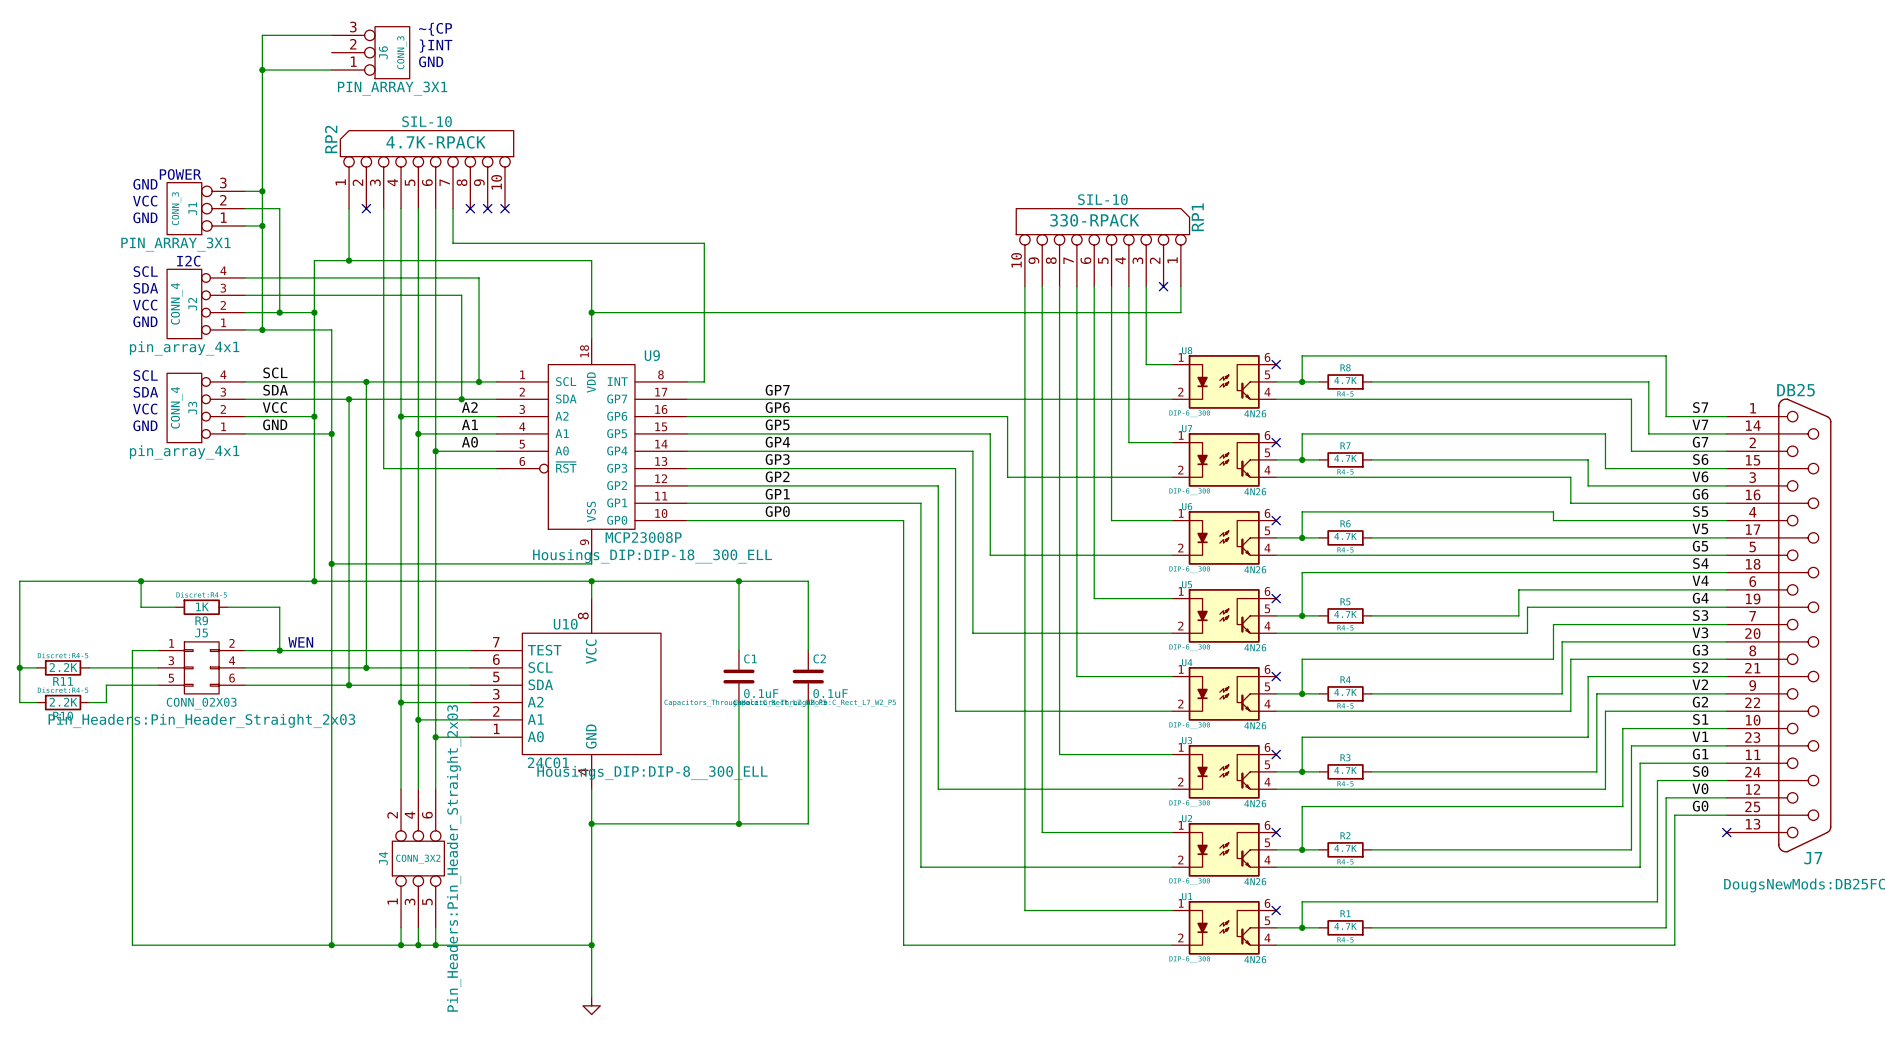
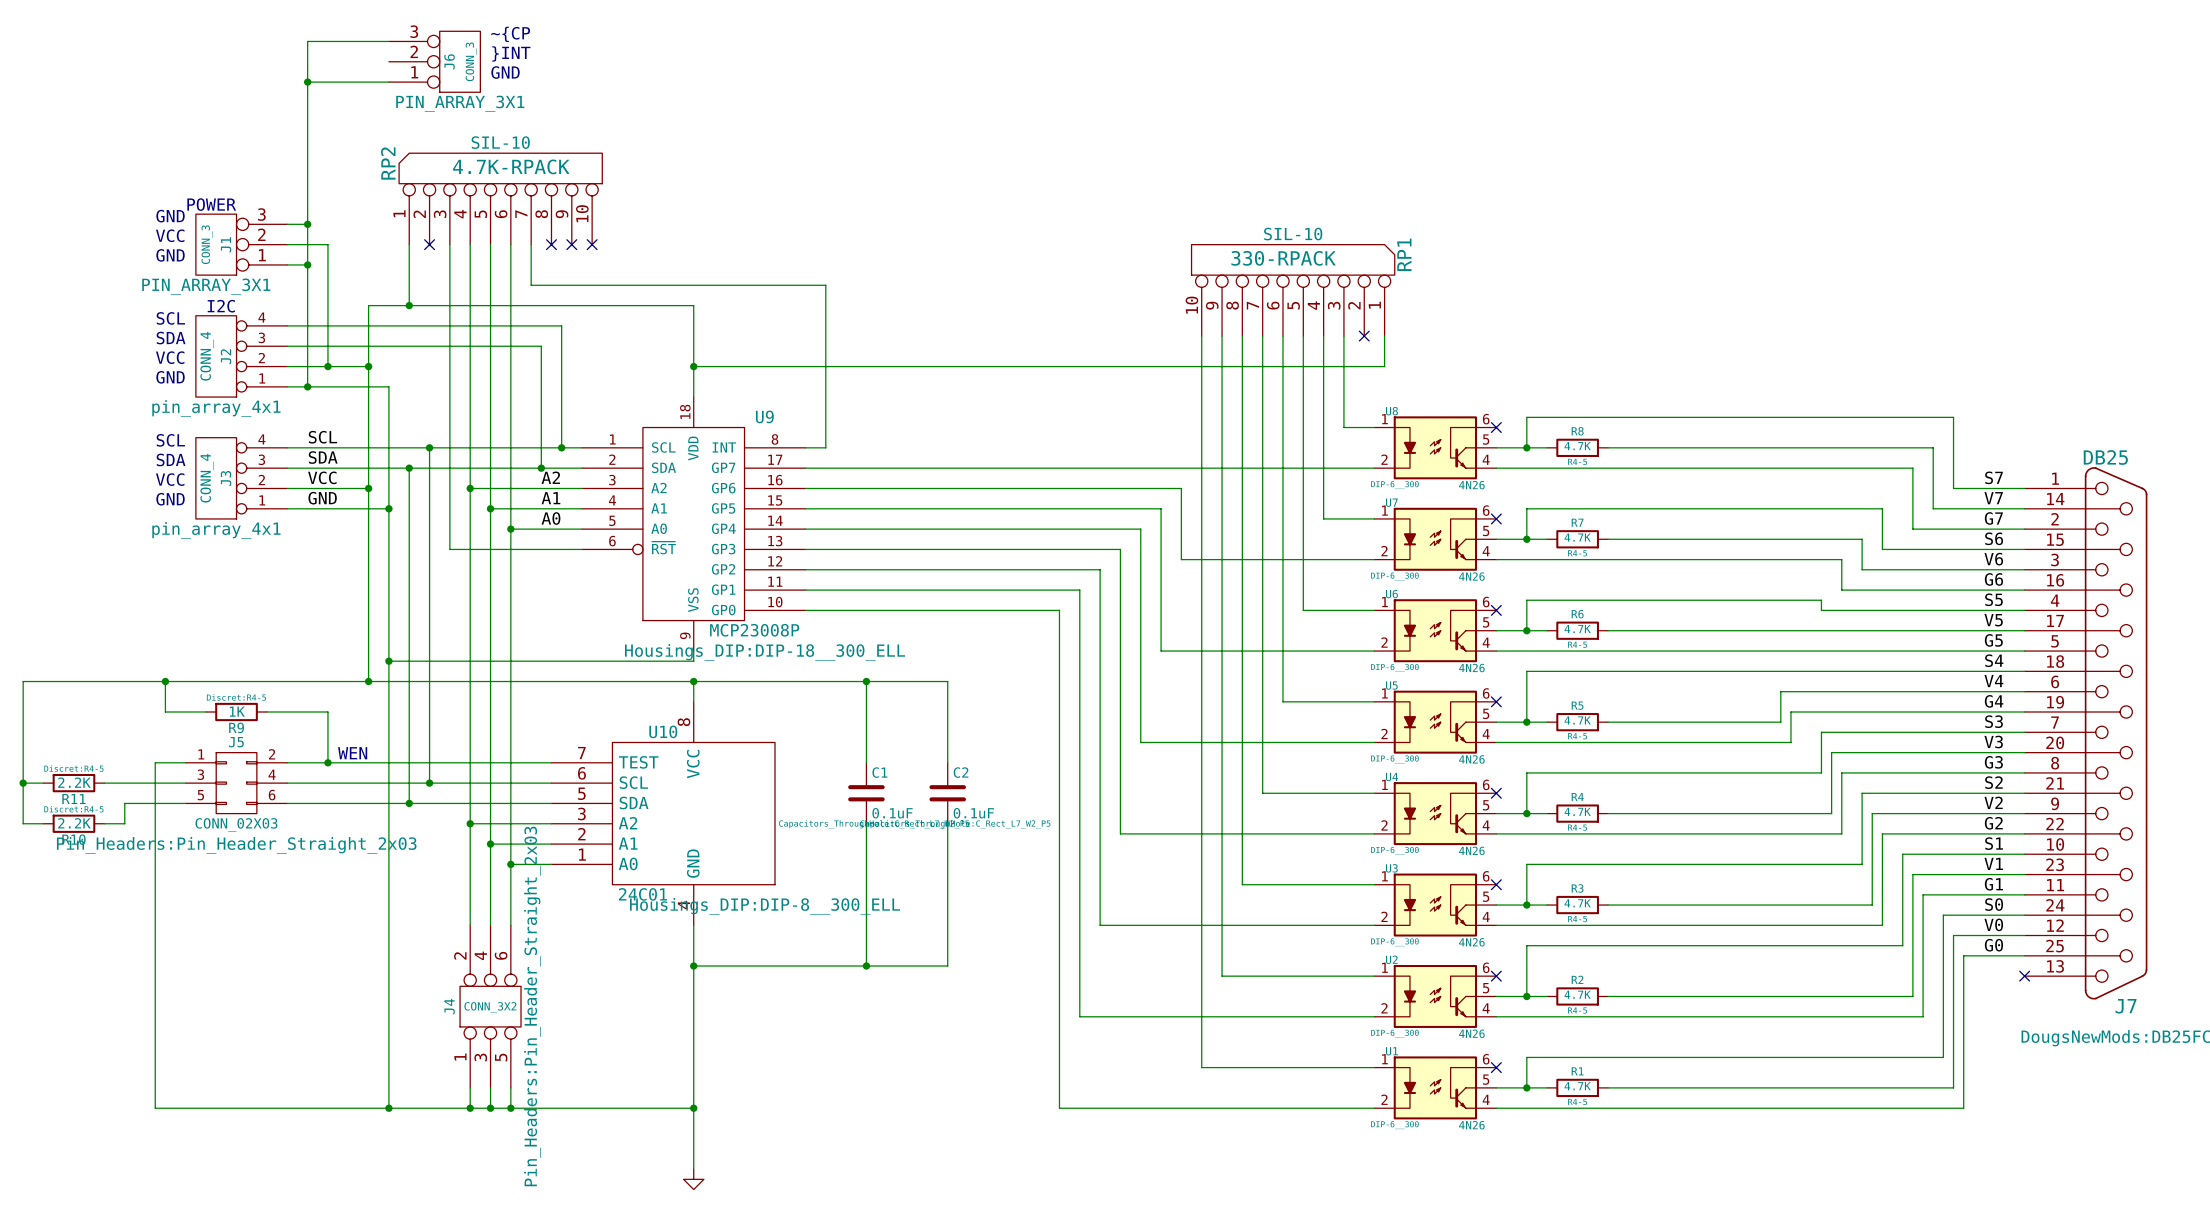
label: GP7 (777, 390) -> none
label: GP6 (777, 407) -> none
label: GP5 (777, 424) -> none
label: GP4 (777, 442) -> none
label: GP3 (777, 459) -> none
label: GP2 (777, 476) -> none
label: GP1 (777, 494) -> none
label: GP0 (777, 511) -> none

